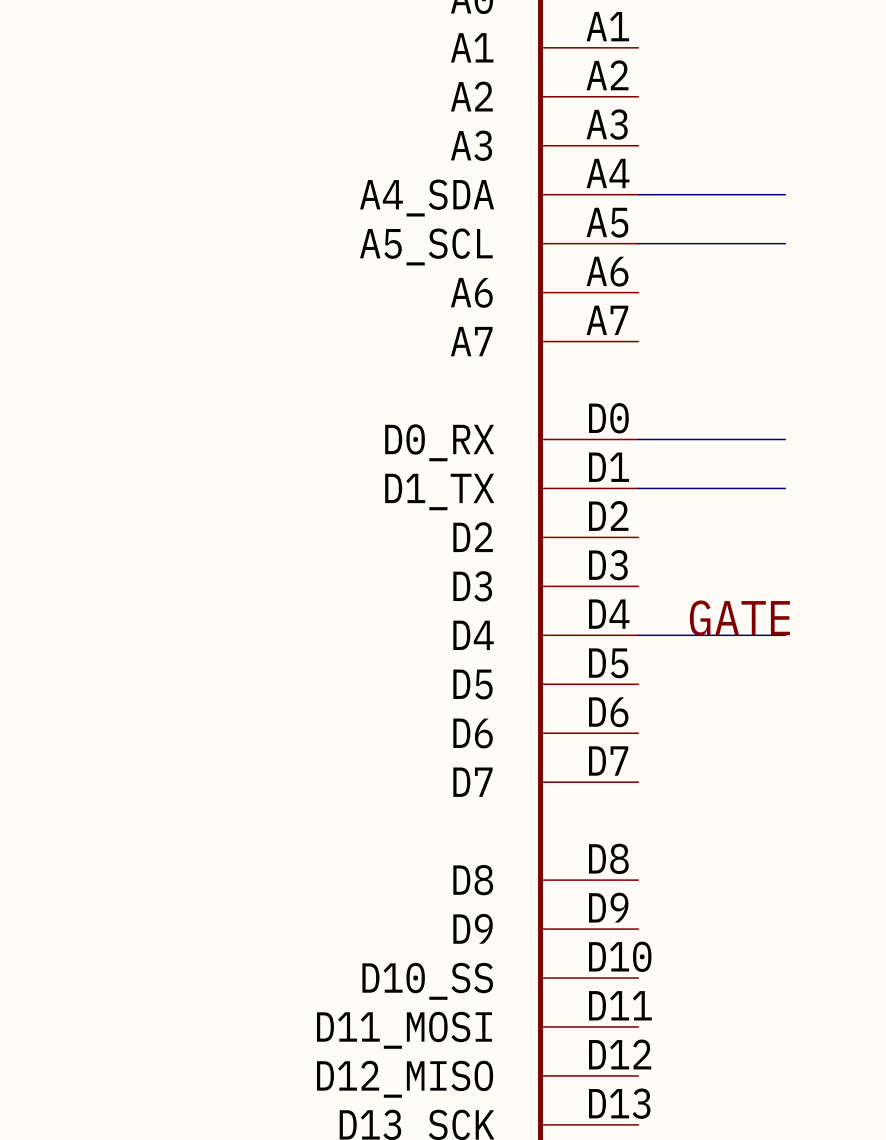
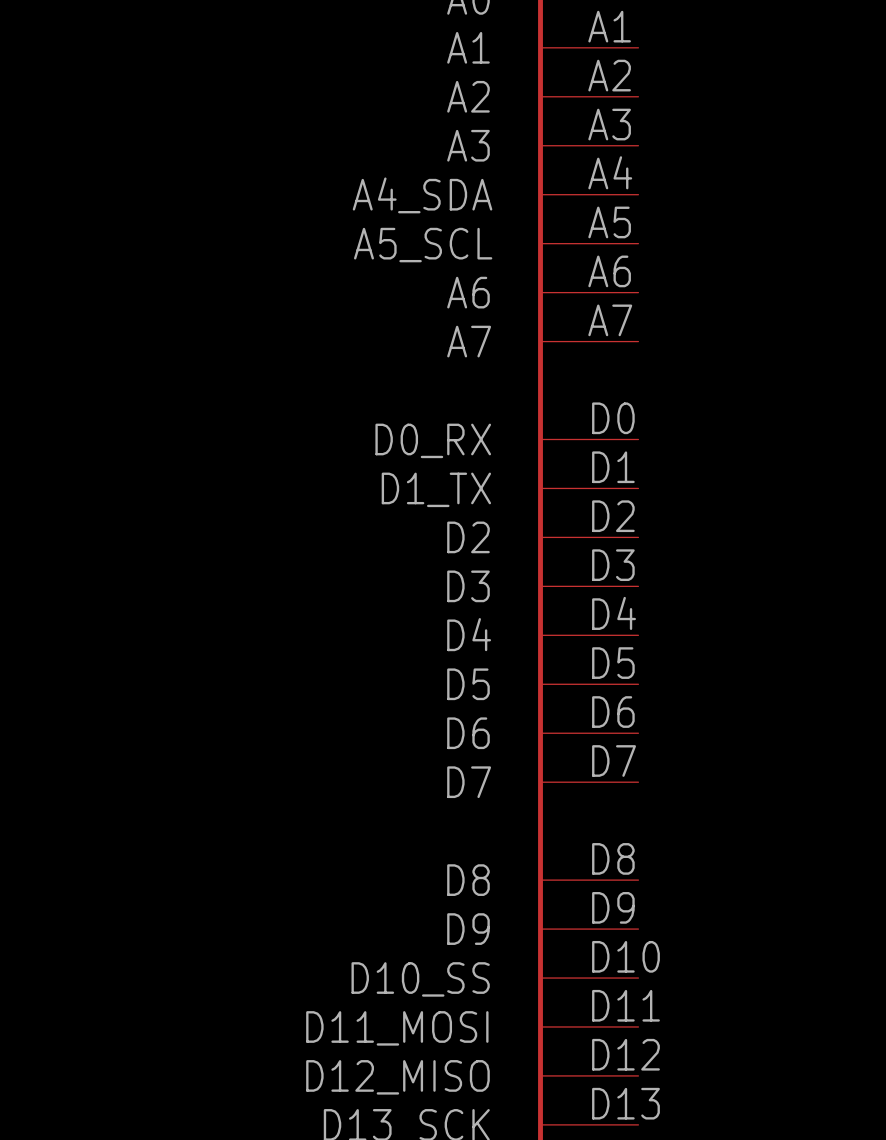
wire: (638, 194) (785, 194) -> none
wire: (638, 243) (785, 243) -> none
wire: (638, 439) (785, 439) -> none
wire: (638, 488) (785, 488) -> none
label: GATE (739, 618) -> none
wire: (638, 635) (785, 635) -> none

